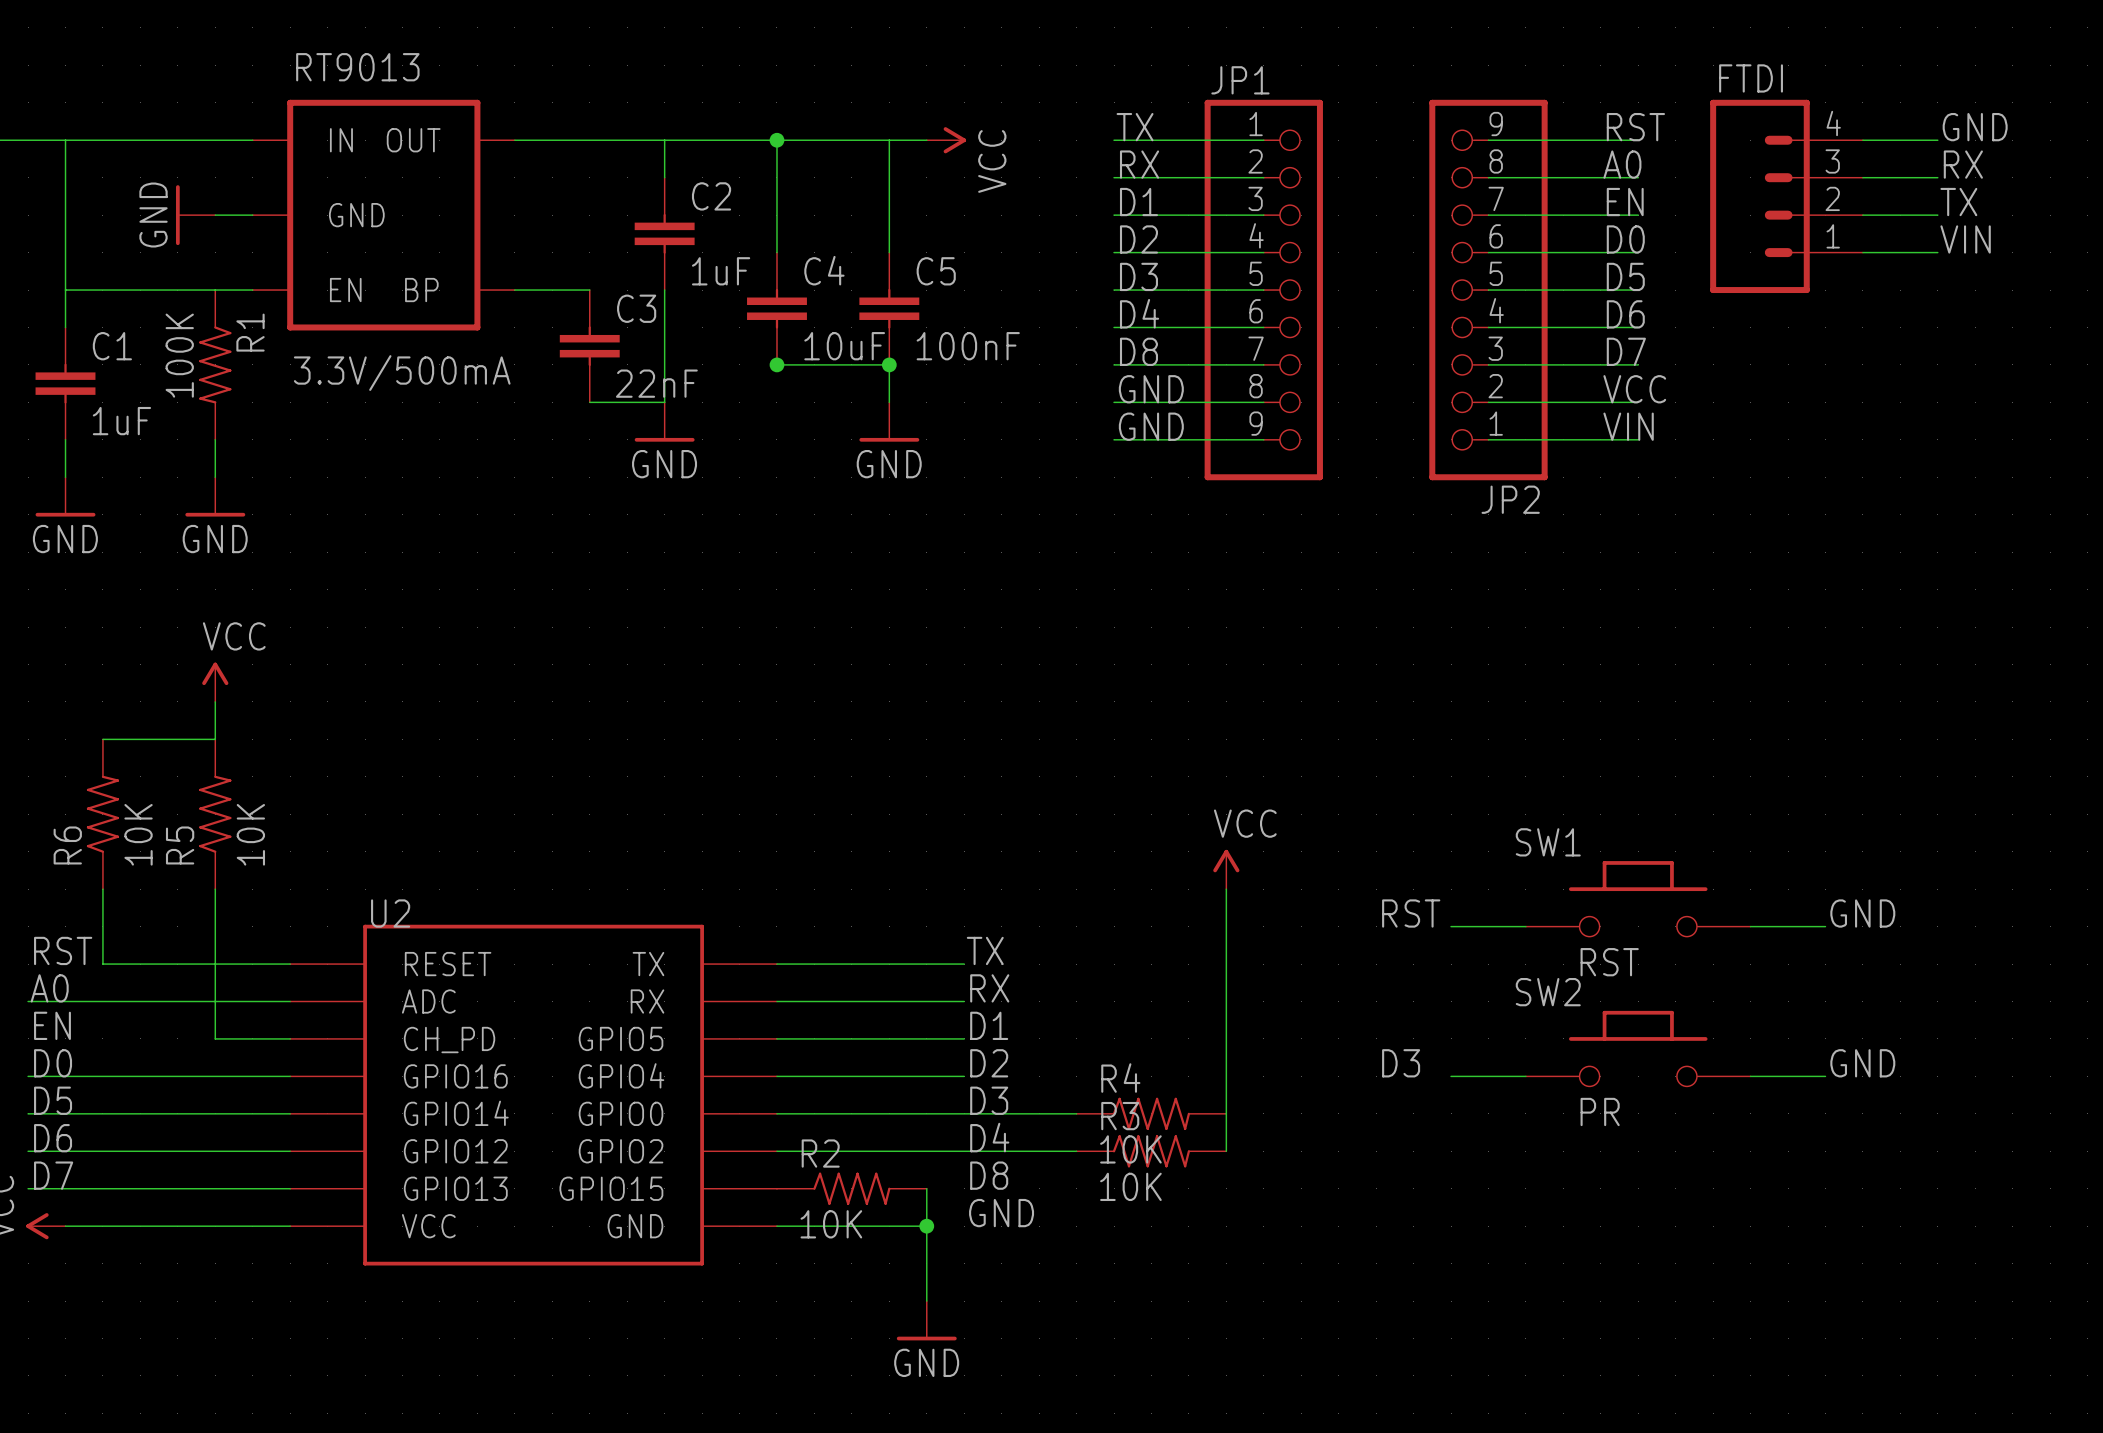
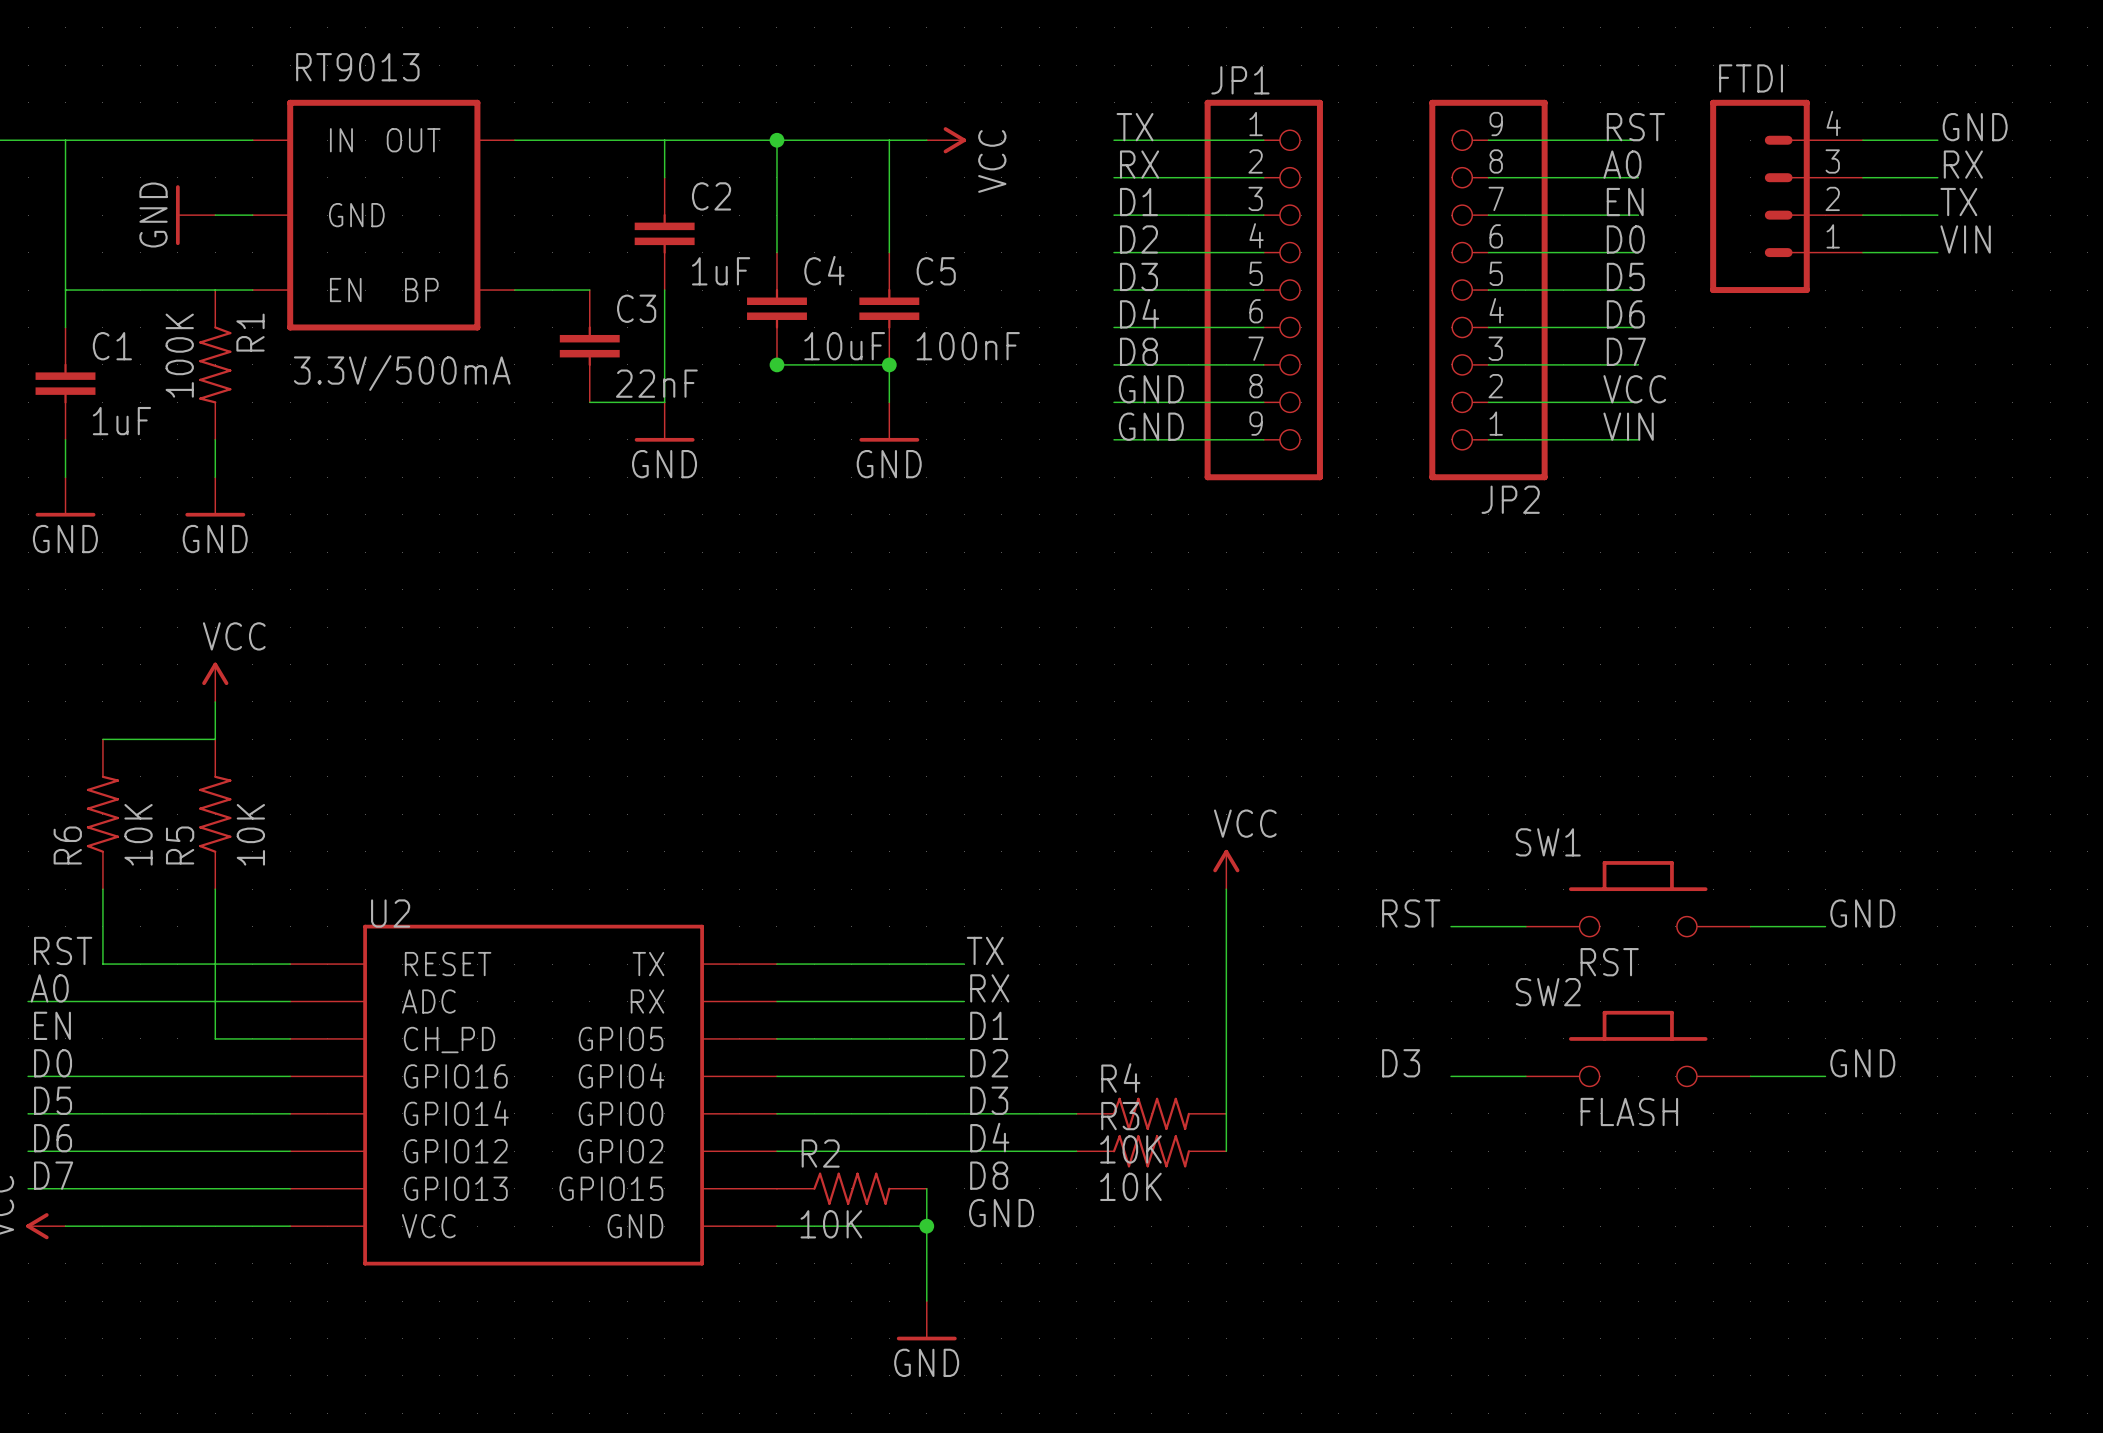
SW2 value: PR (1600, 1111) -> FLASH (1629, 1111)

